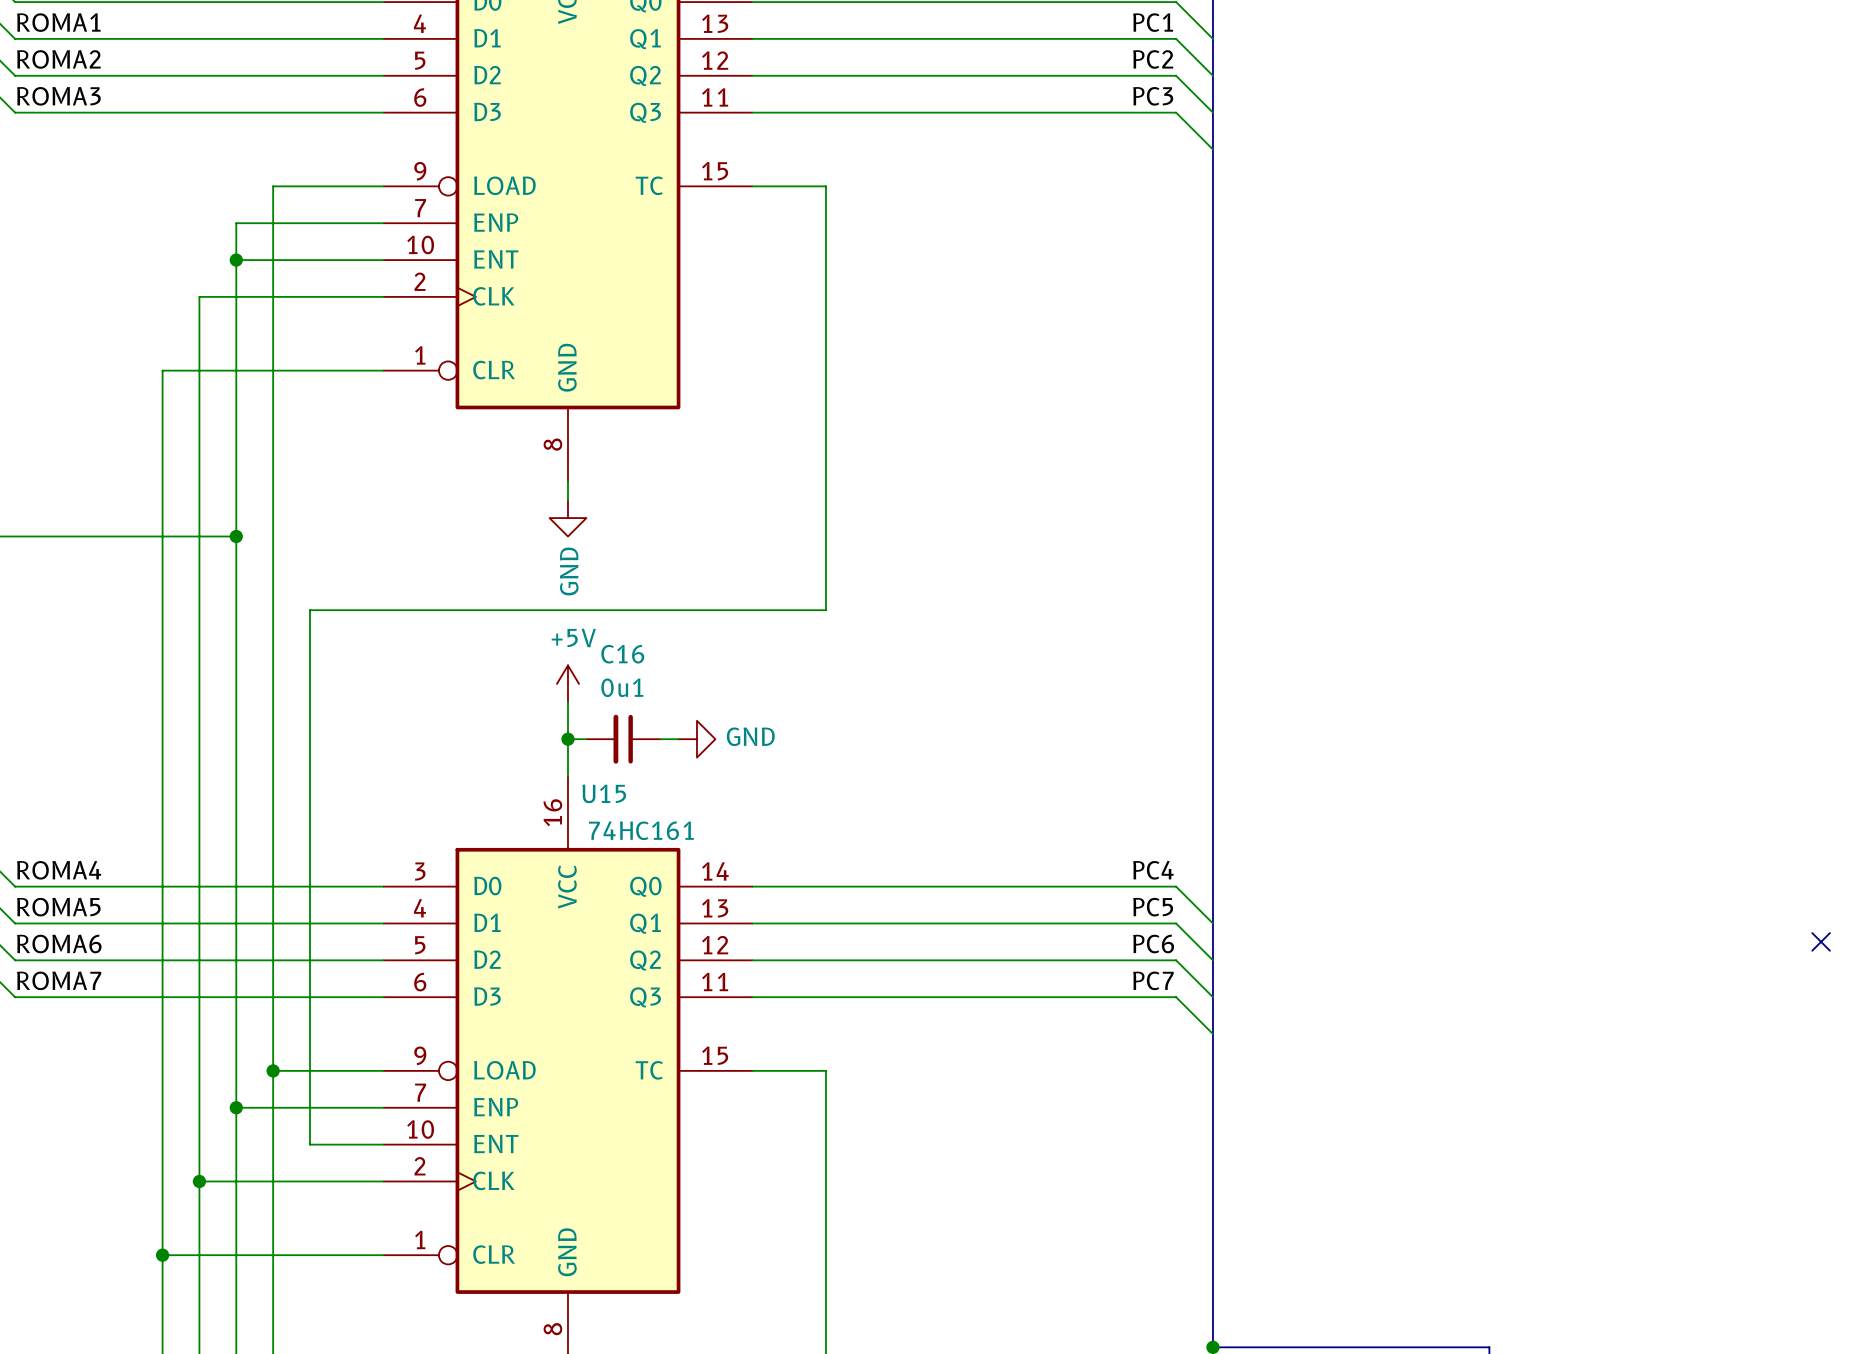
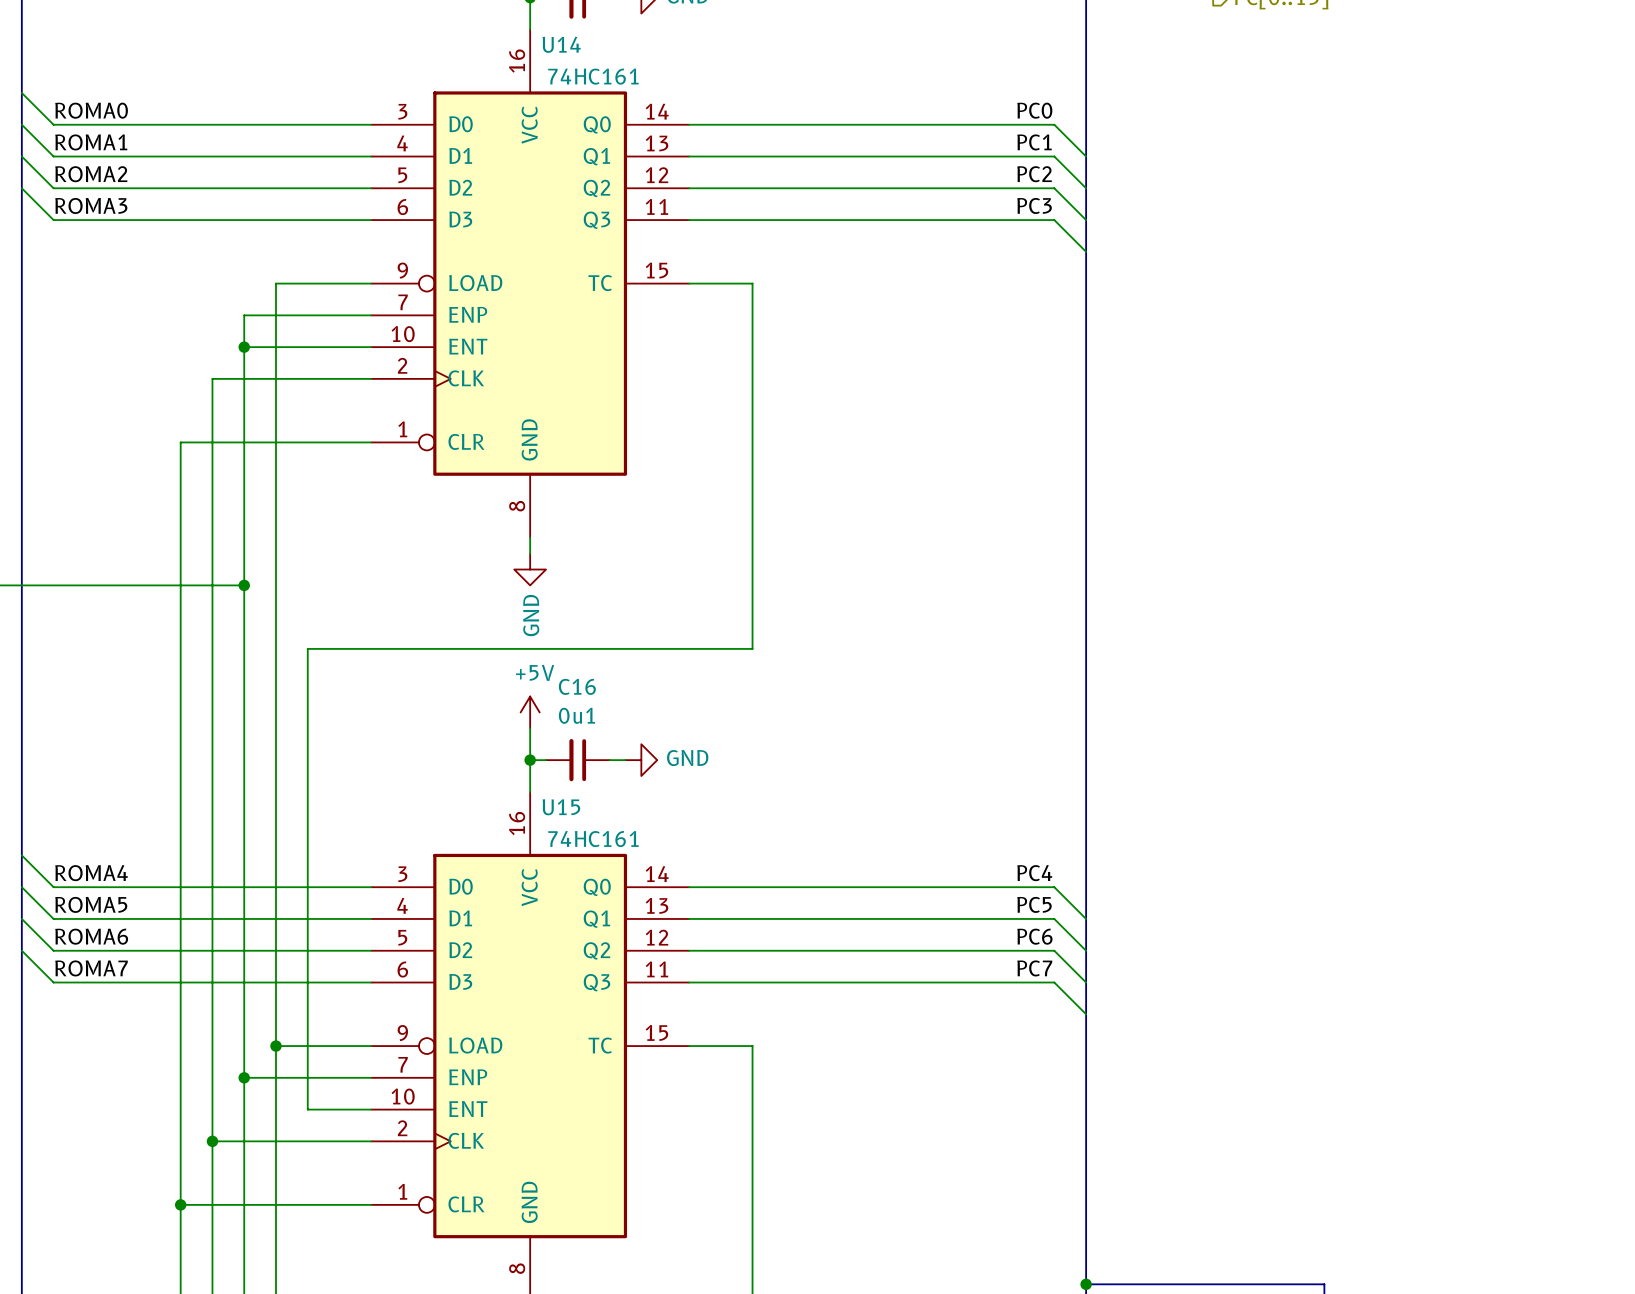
no-connect mark: (1821, 941) -> none

